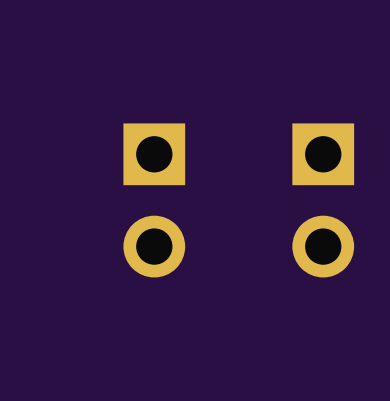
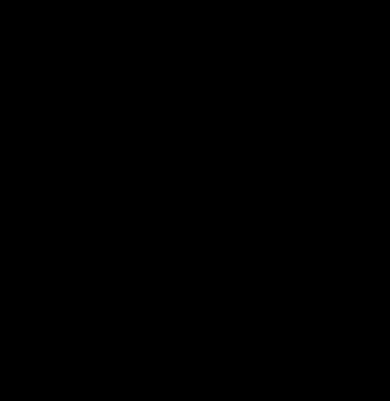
part: (154, 200) -> none
part: (323, 200) -> none

